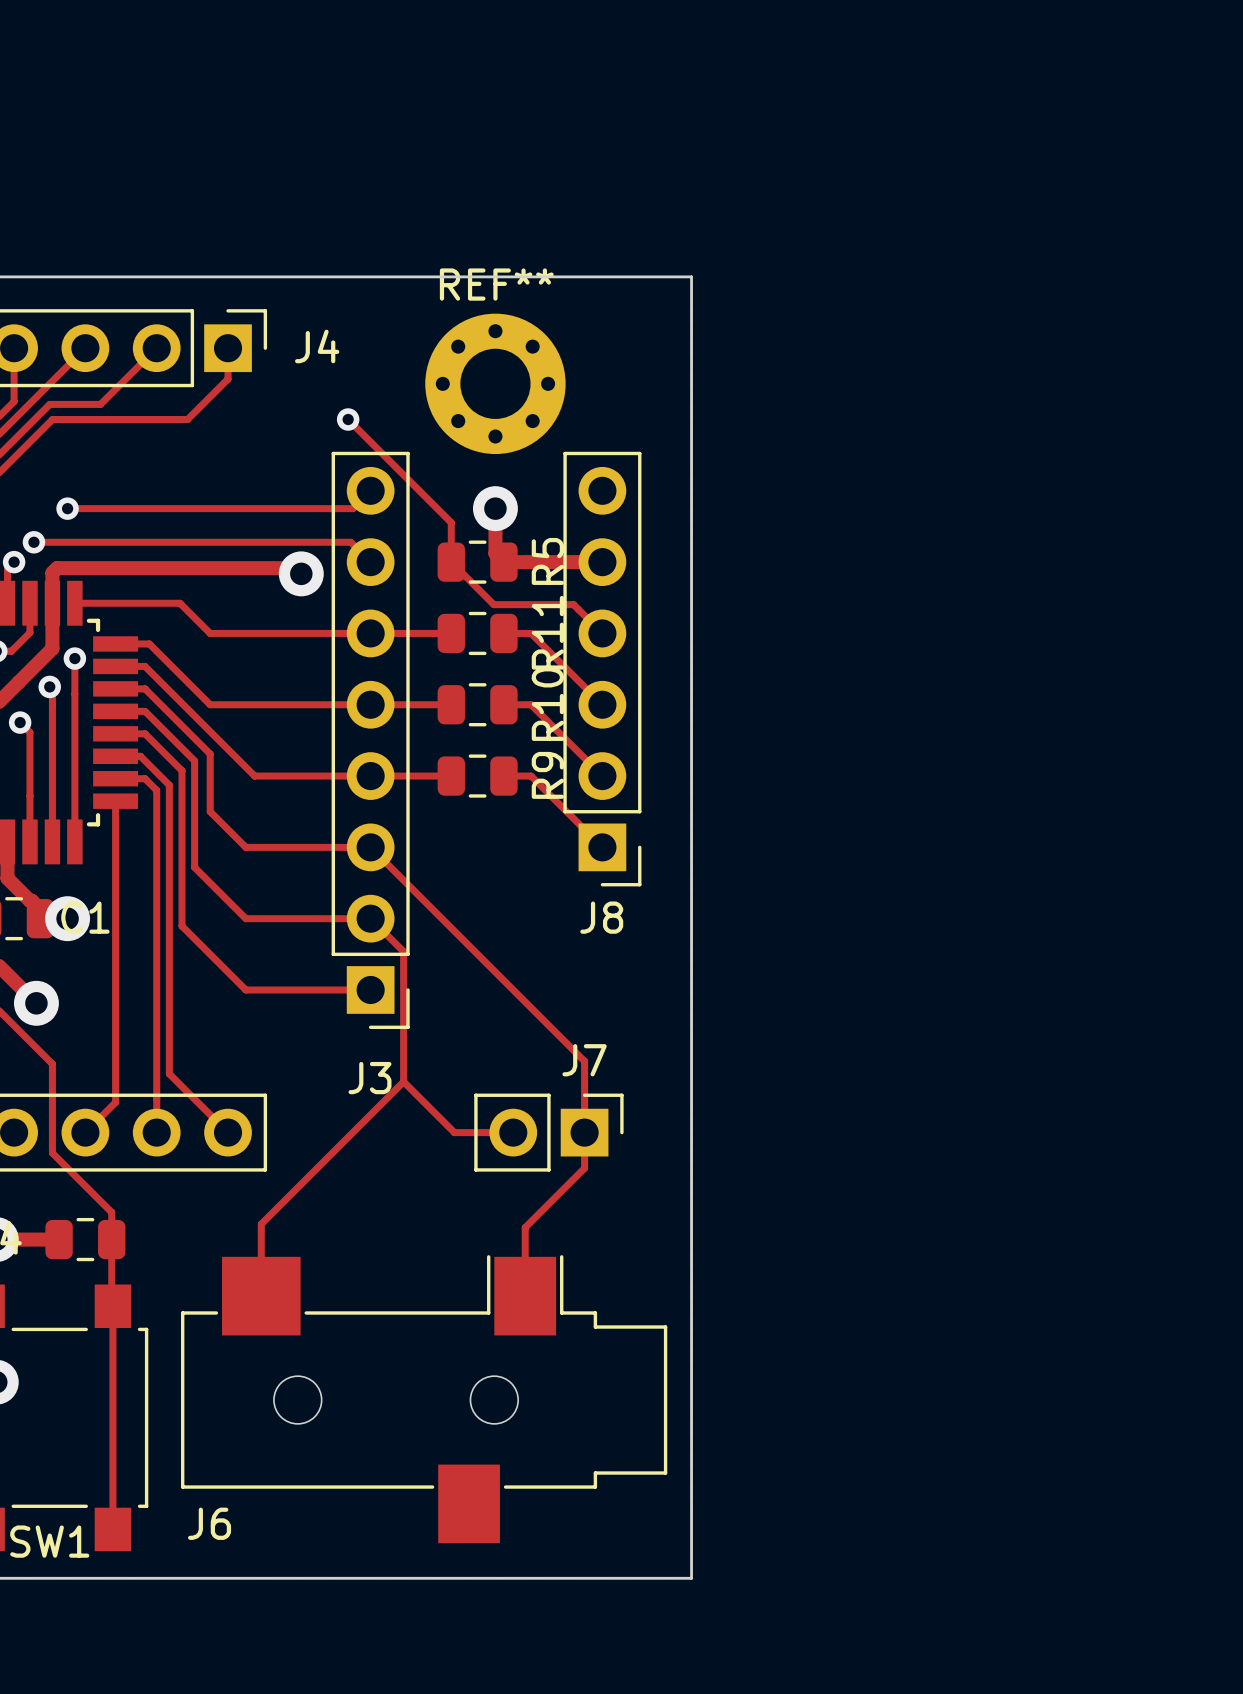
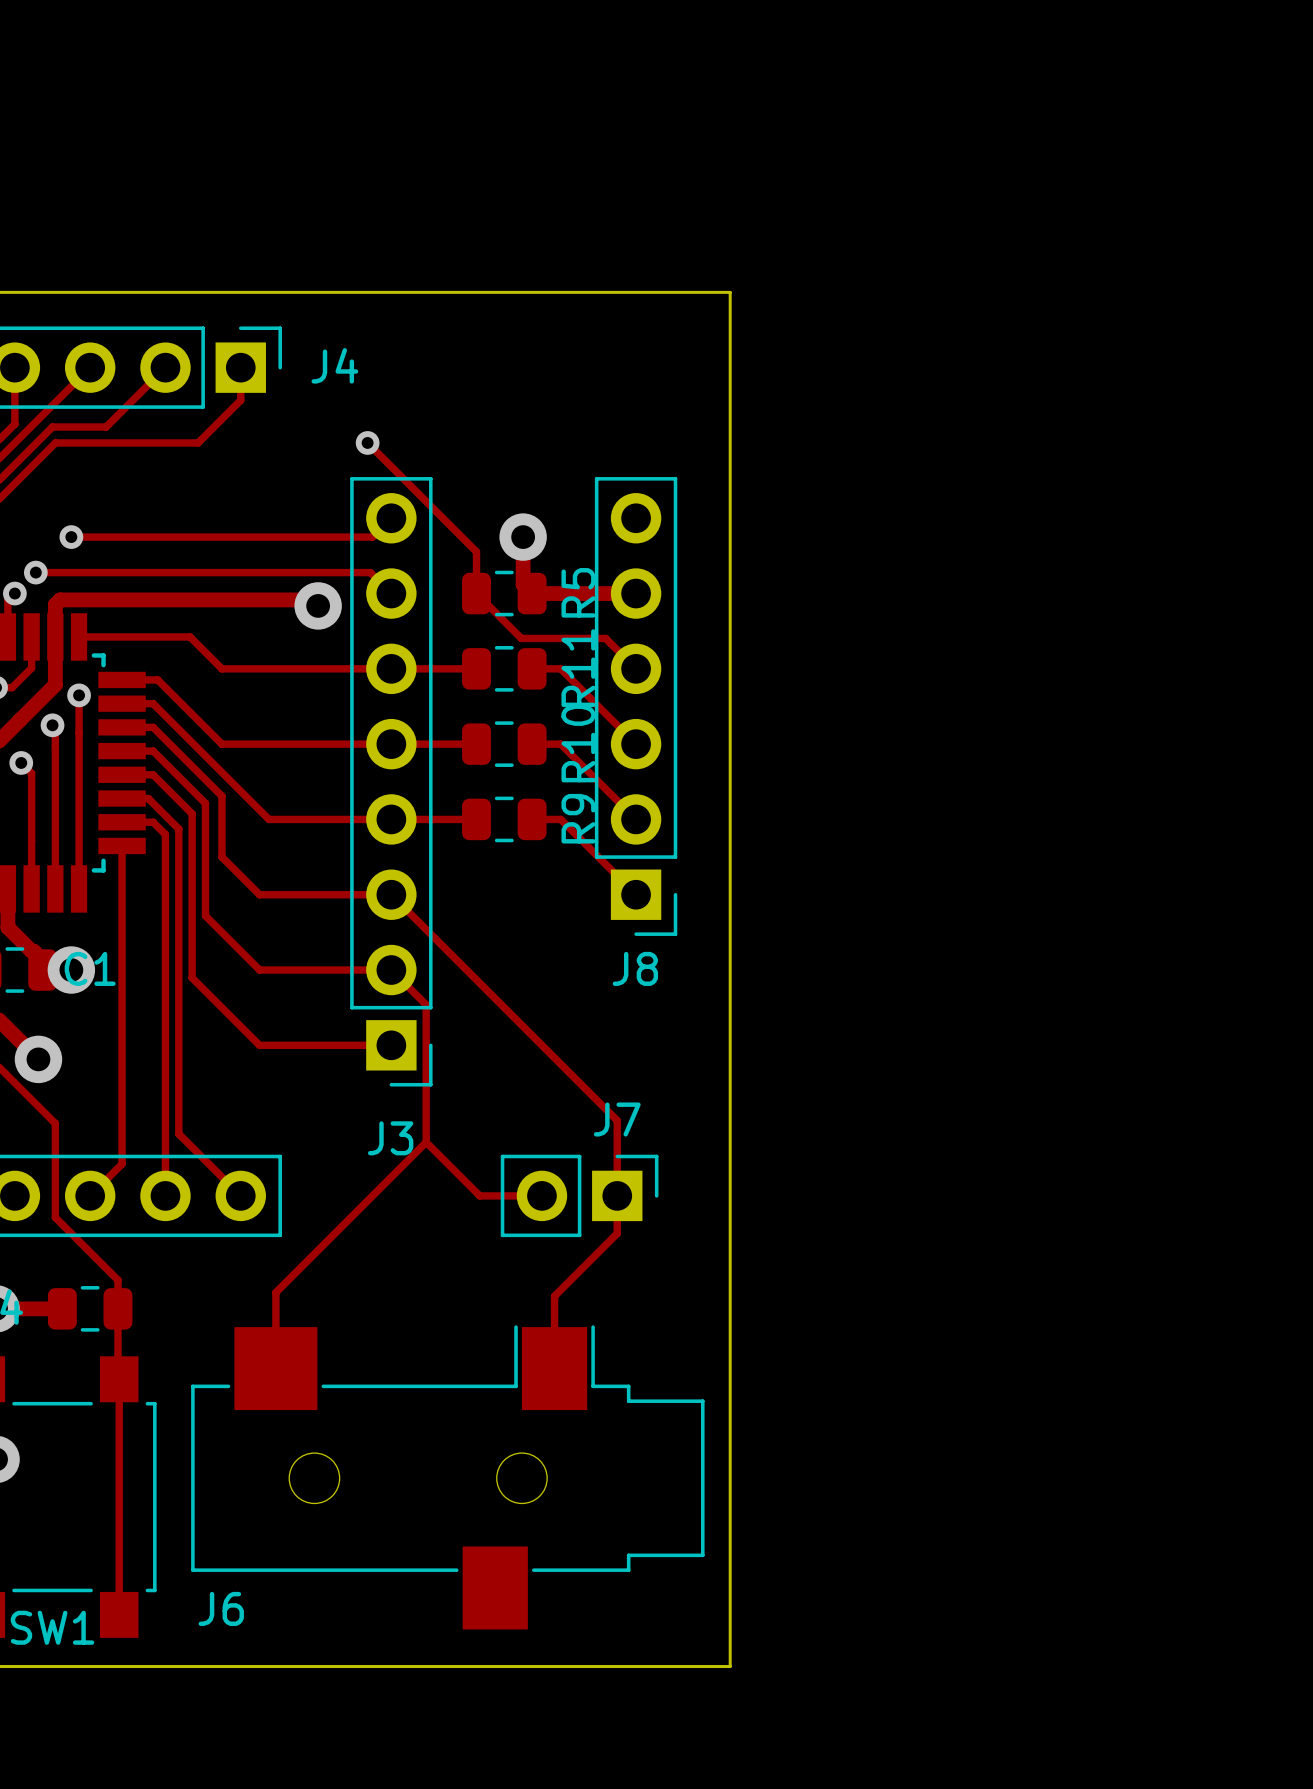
REF**: (495, 383) -> none

